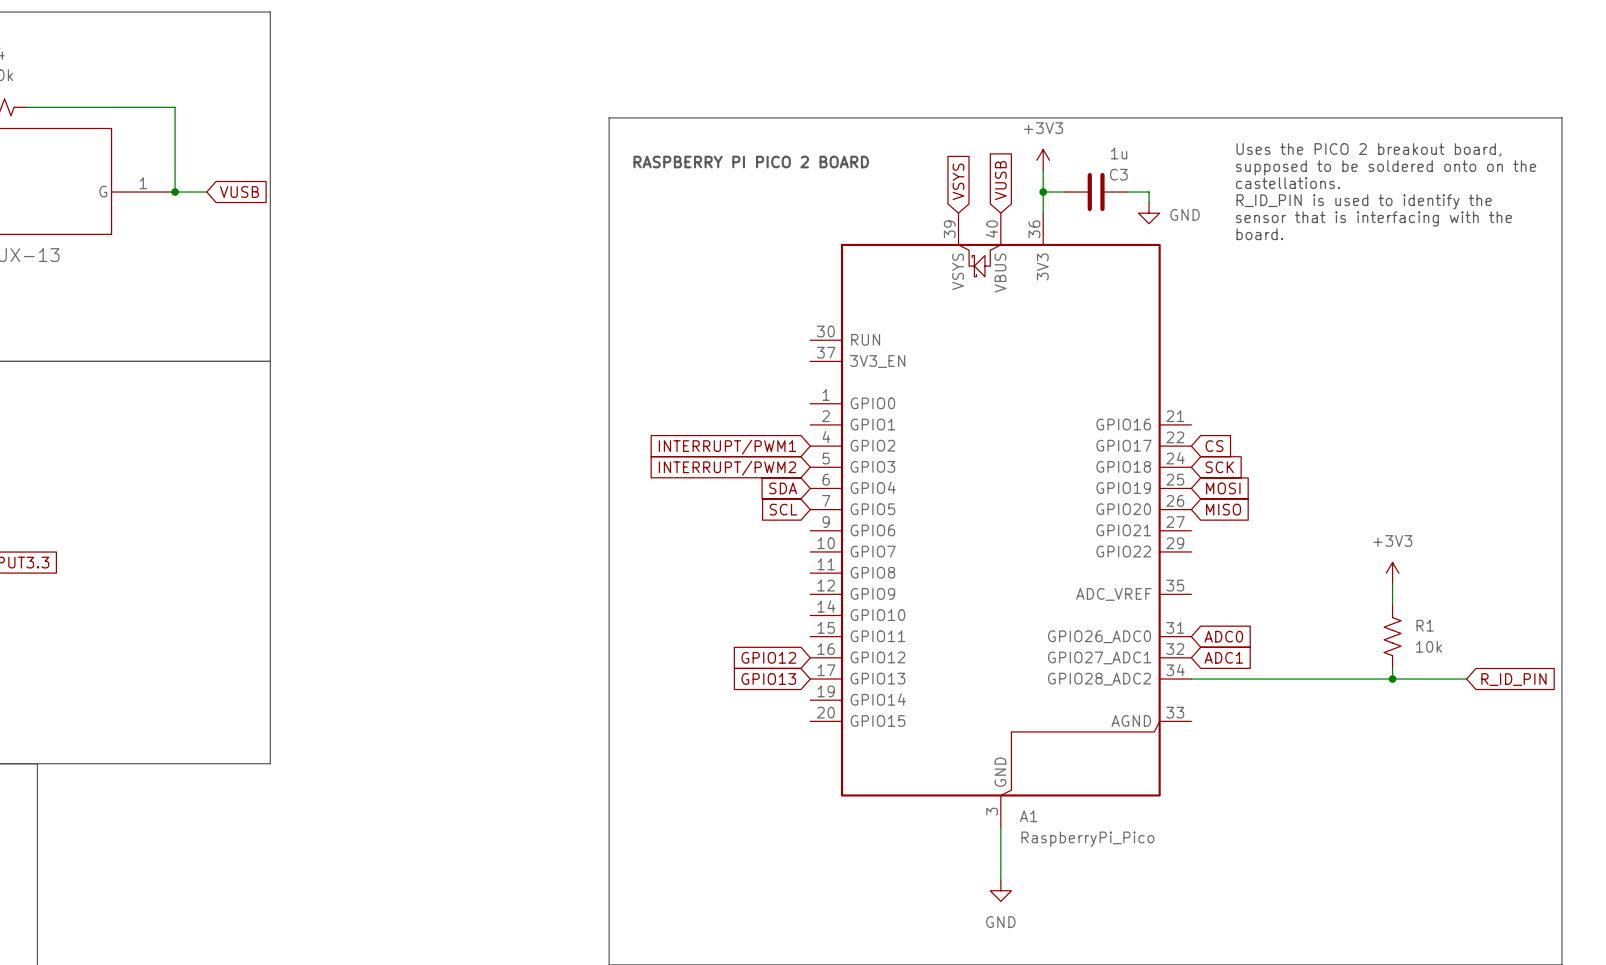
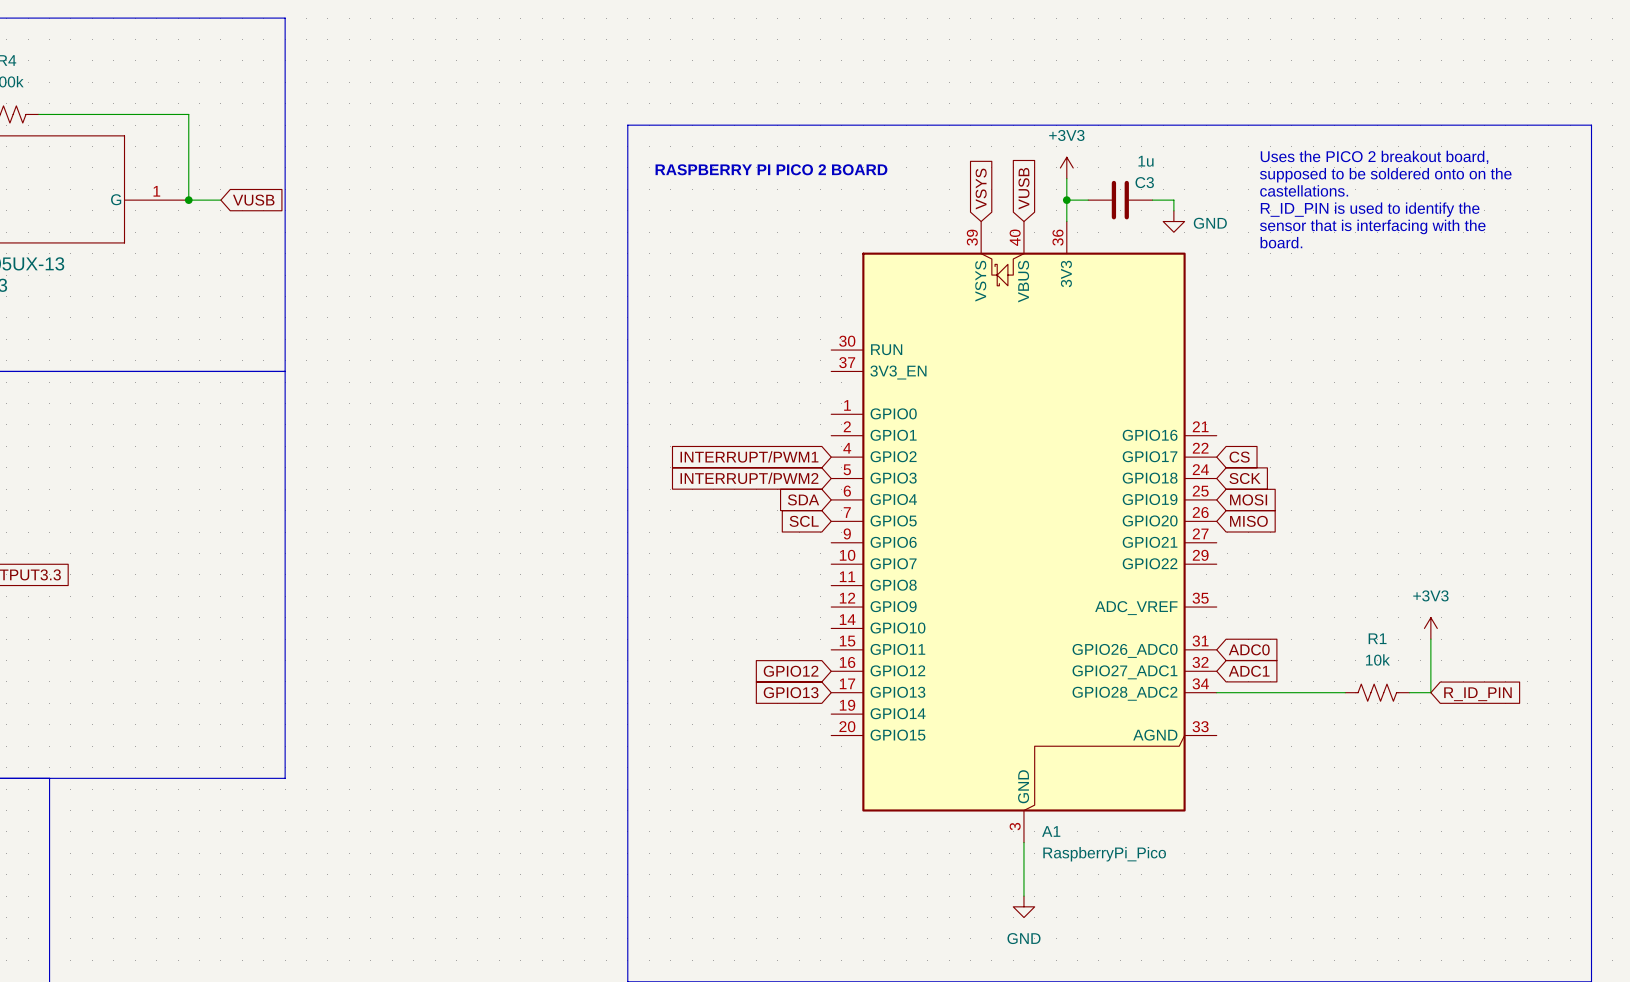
power symbol position: +3V3 (1392, 573) -> +3V3 (1430, 628)
wire: (1392, 583) (1392, 604) -> none
R1 name position: R1 (1425, 625) -> R1 (1377, 638)
R1 rotation: 0° (1392, 636) -> 90° clockwise (1377, 692)
R1 position: (1392, 636) -> (1377, 692)
R1 value position: 10k (1428, 646) -> 10k (1377, 659)
wire: (1392, 668) (1392, 679) -> none
junction: (1392, 679) -> none
wire: (1403, 679) (1466, 679) -> (1430, 692) (1430, 639)
global label position: R_ID_PIN (1513, 679) -> R_ID_PIN (1477, 694)

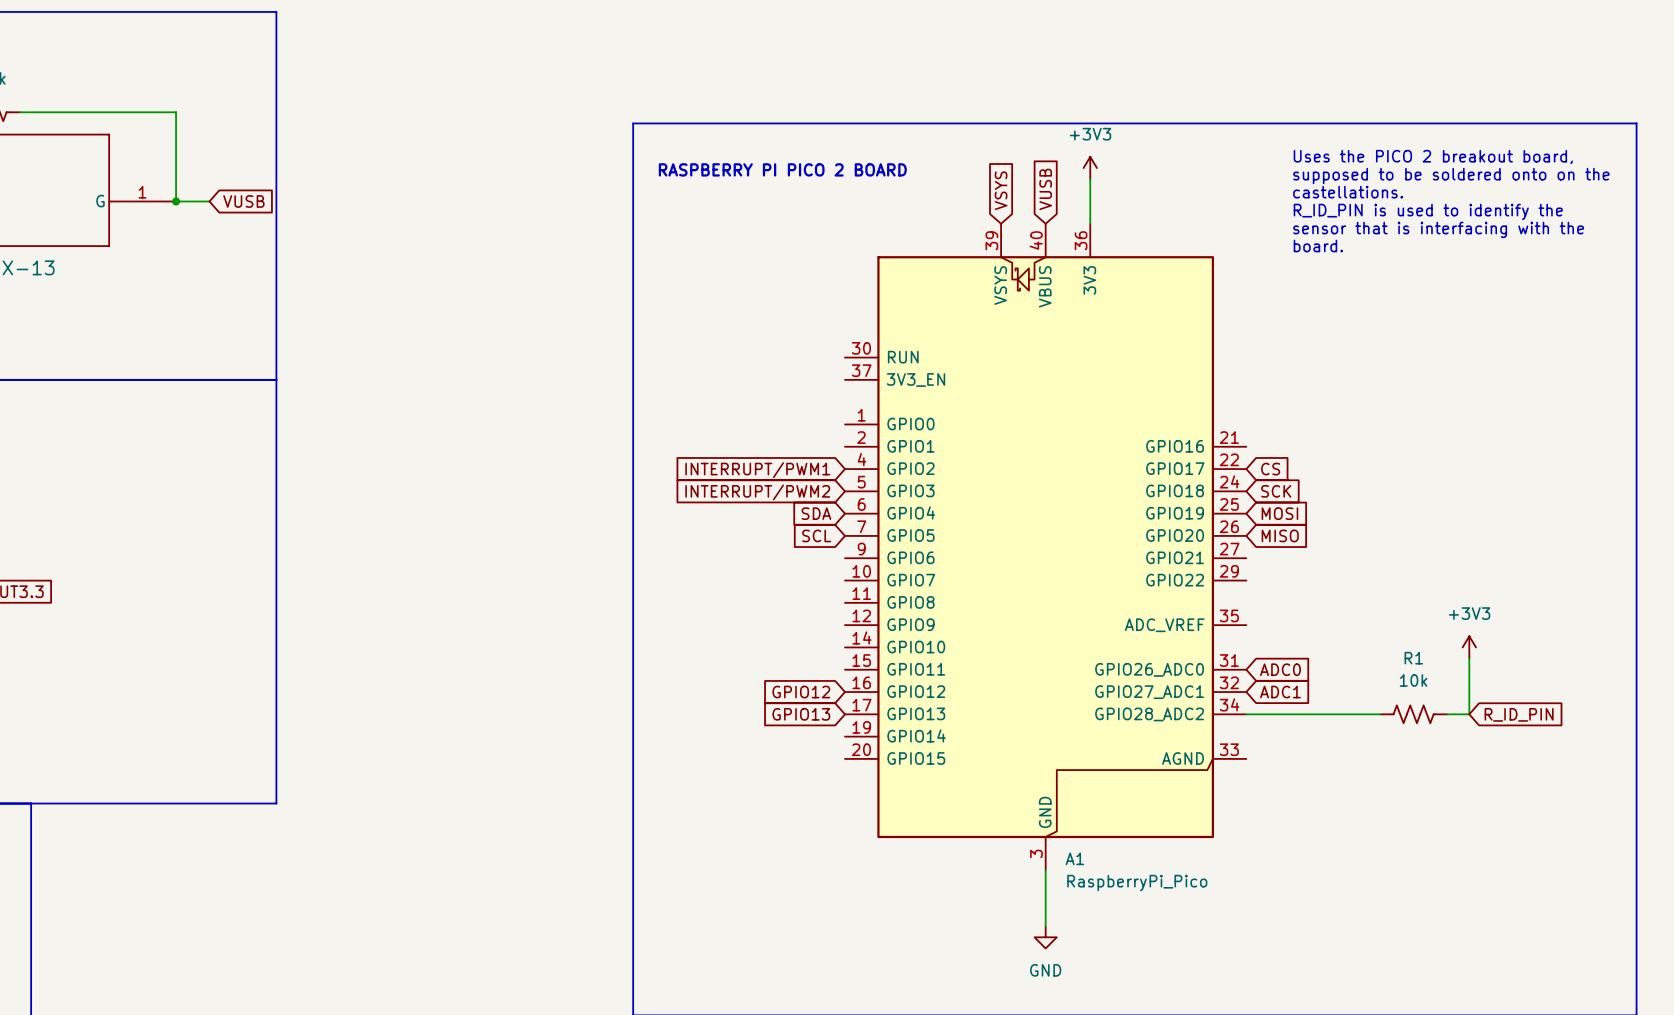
wire: (1066, 200) (1088, 200) -> none
junction: (1066, 200) -> none
C3: 1u (1120, 200) -> none
wire: (1152, 200) (1173, 200) (1173, 210) -> none
power symbol: GND (1173, 221) -> none

